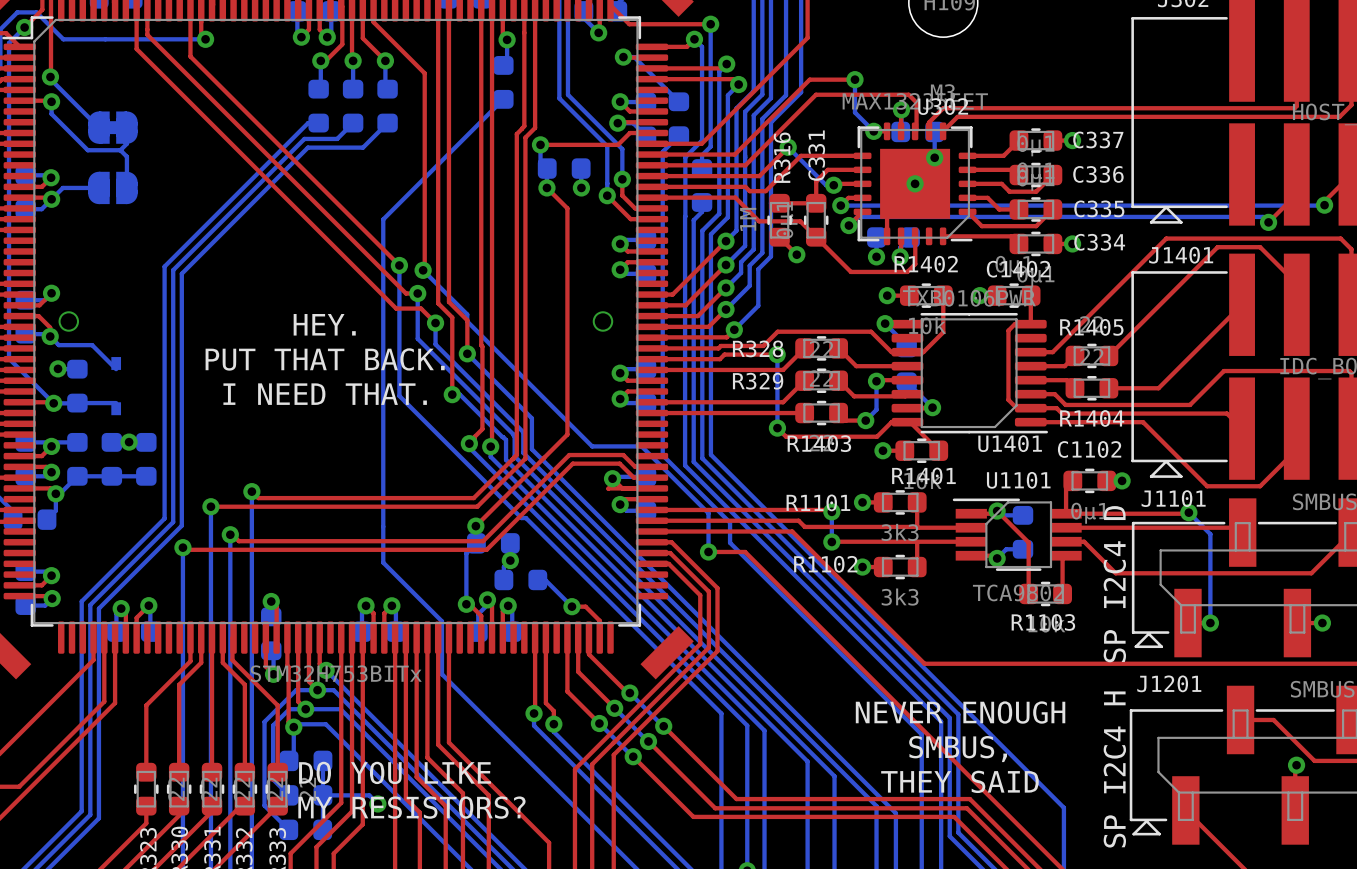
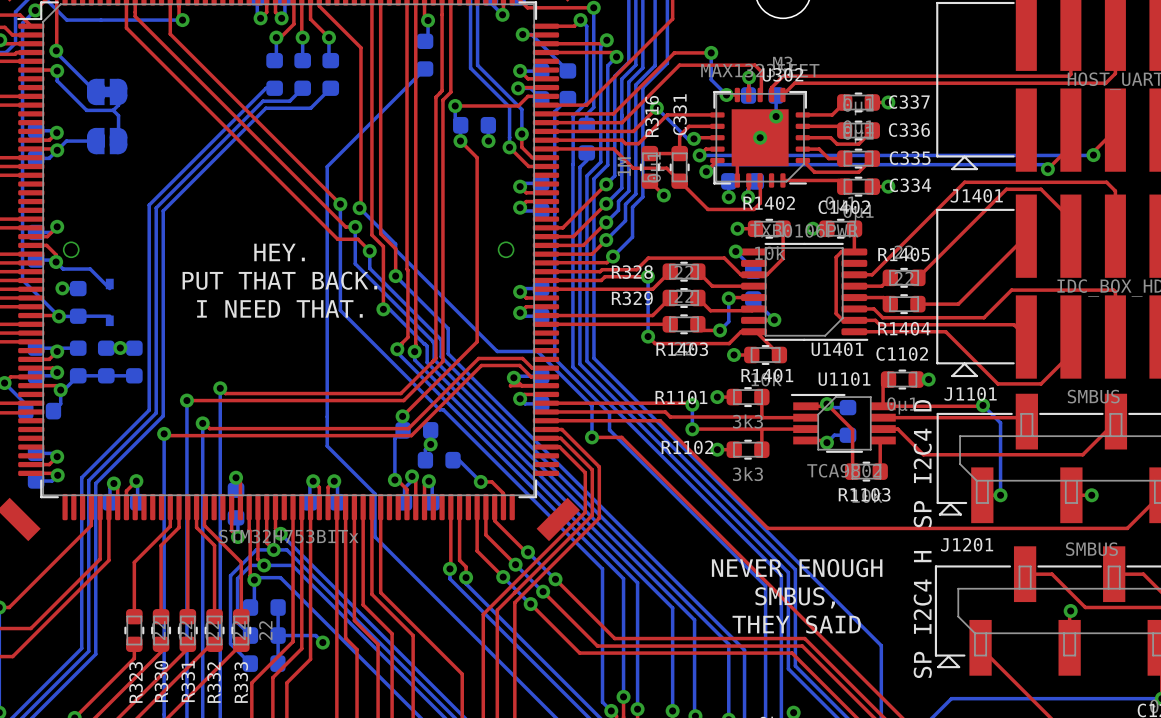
text: DO YOU LIKE (394, 772) -> none
text: MY RESISTORS? (411, 807) -> none

